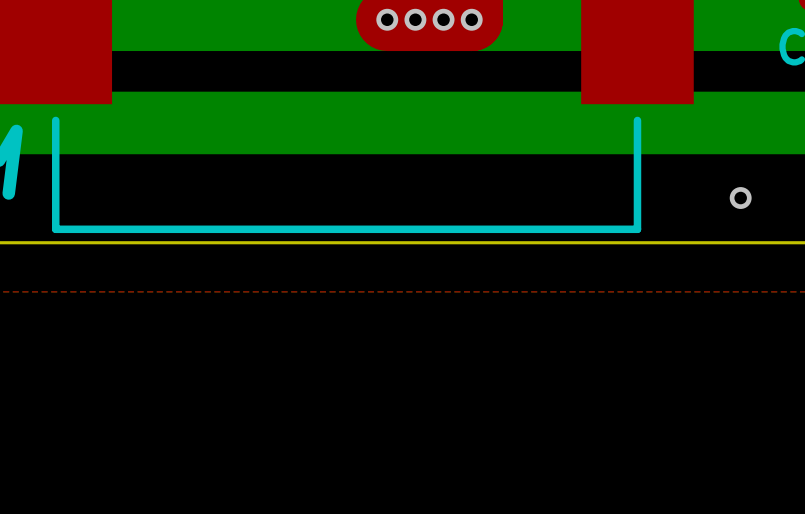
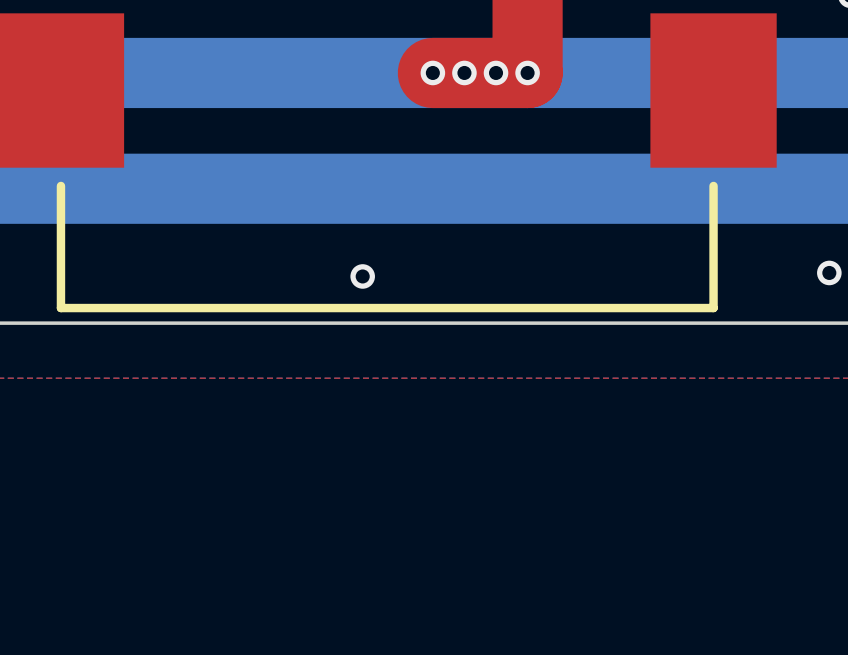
via: none -> (362, 276)

